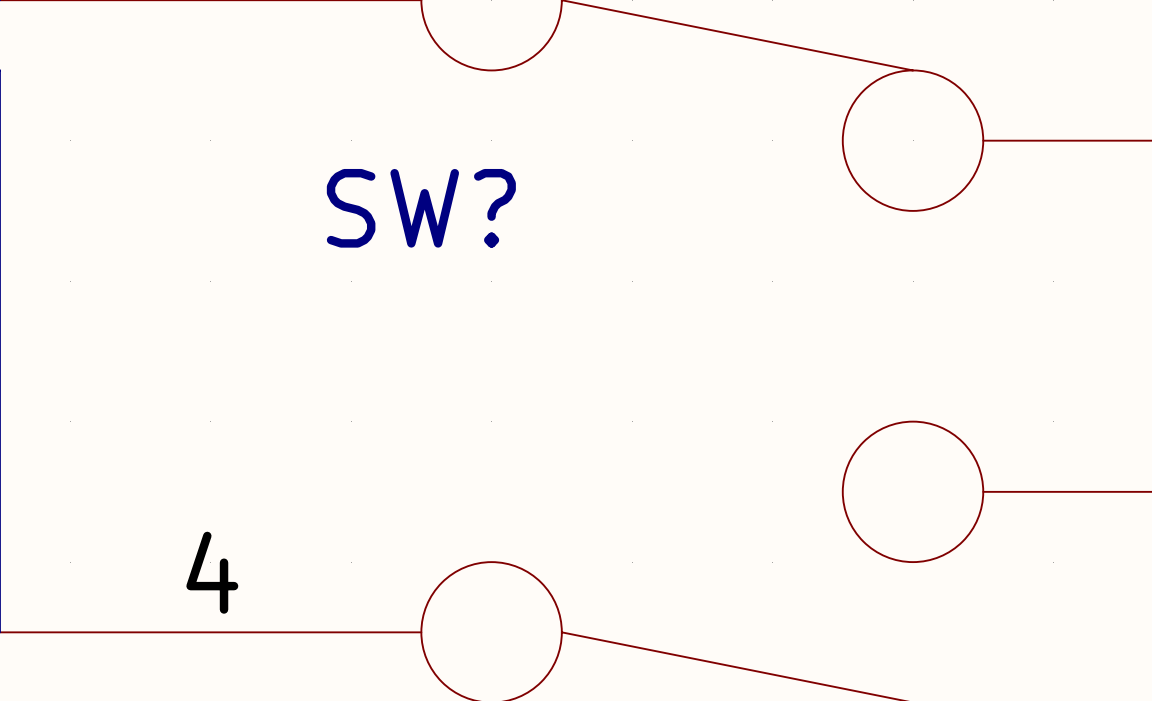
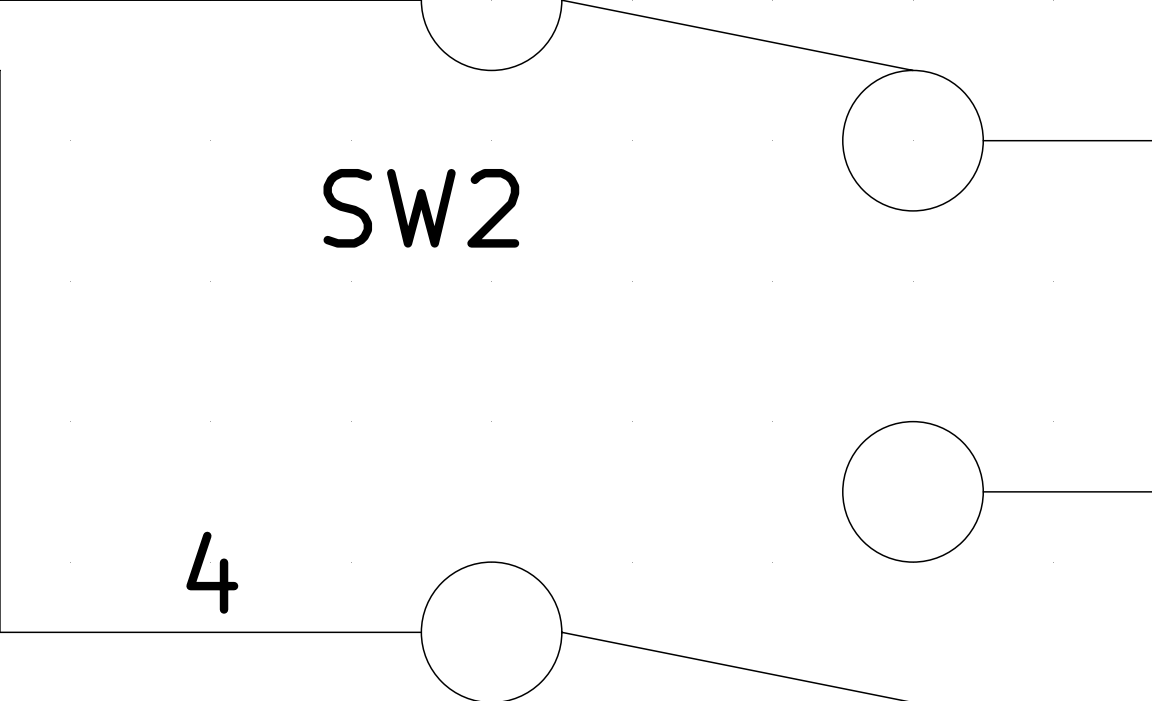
SW? name: SW? (421, 208) -> SW2 (421, 208)

